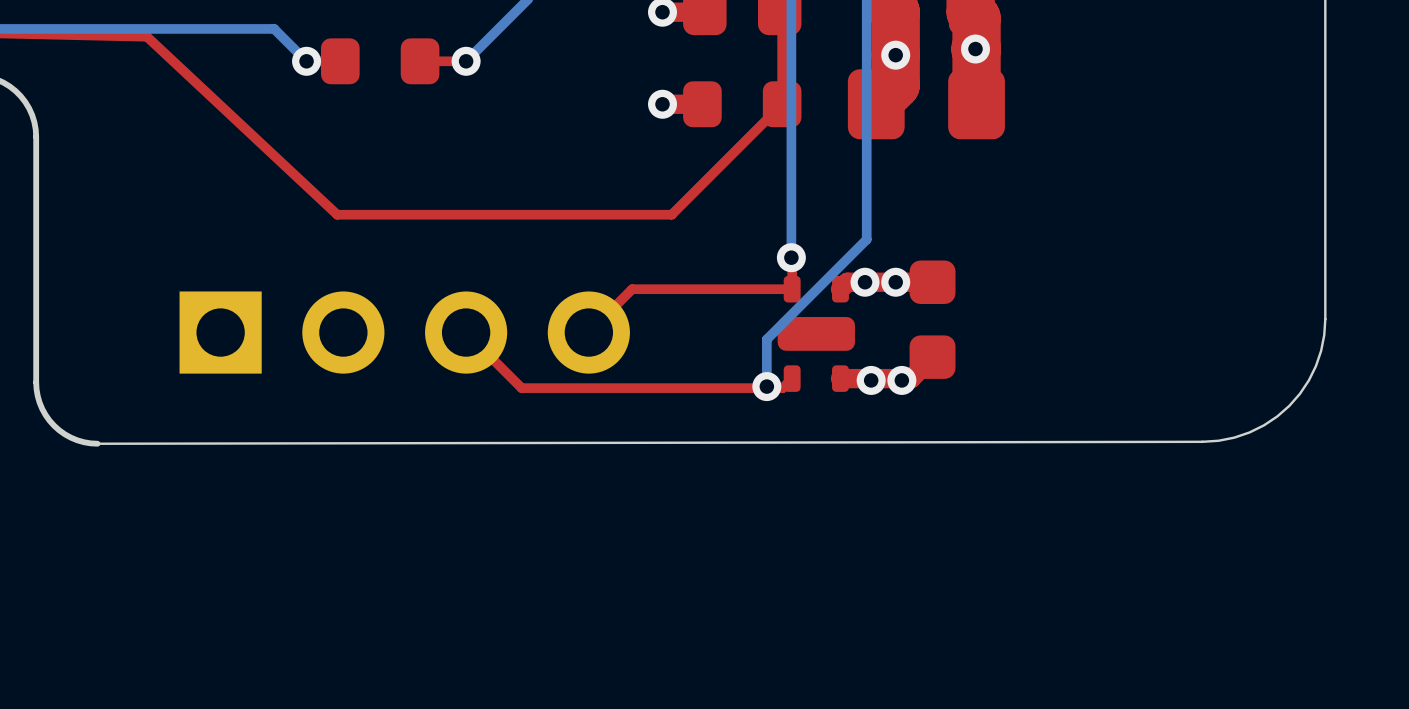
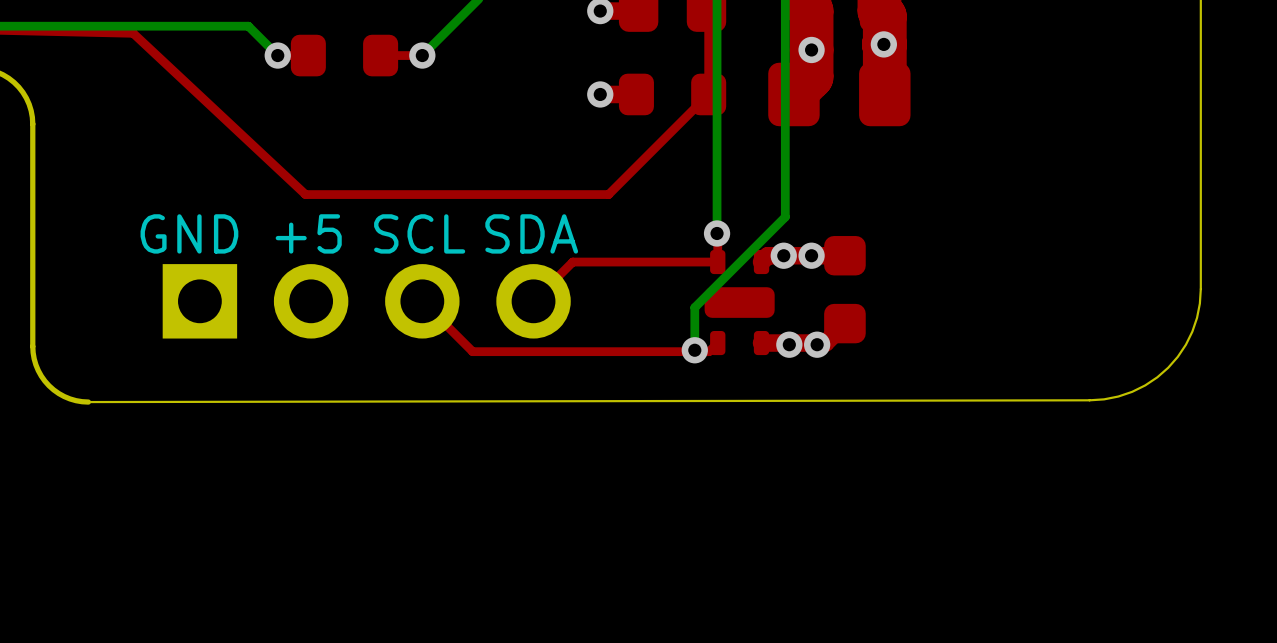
text: none -> GND (189, 233)
text: none -> +5 (308, 233)
text: none -> SCL (419, 233)
text: none -> SDA (531, 233)

